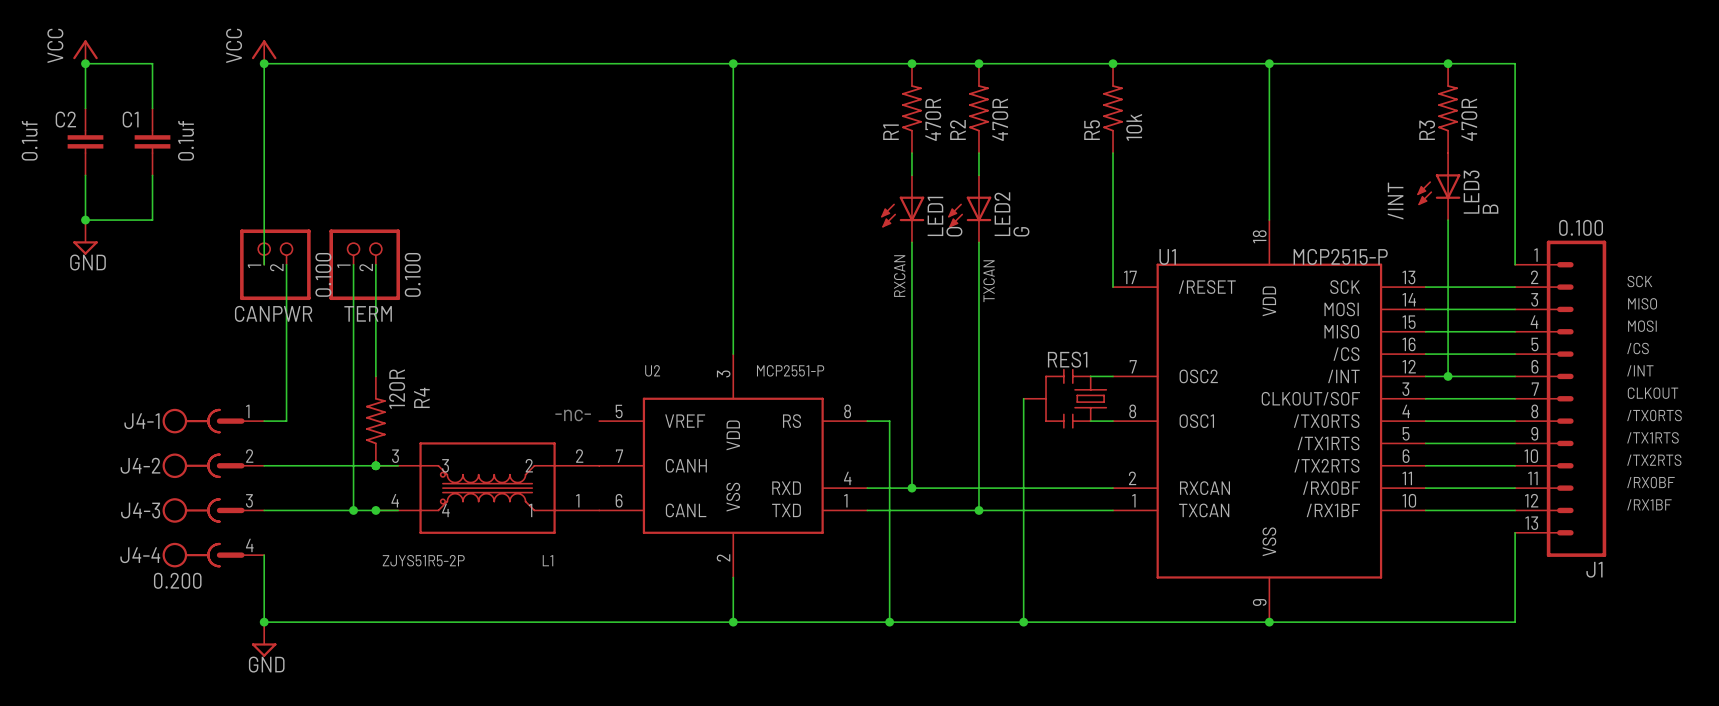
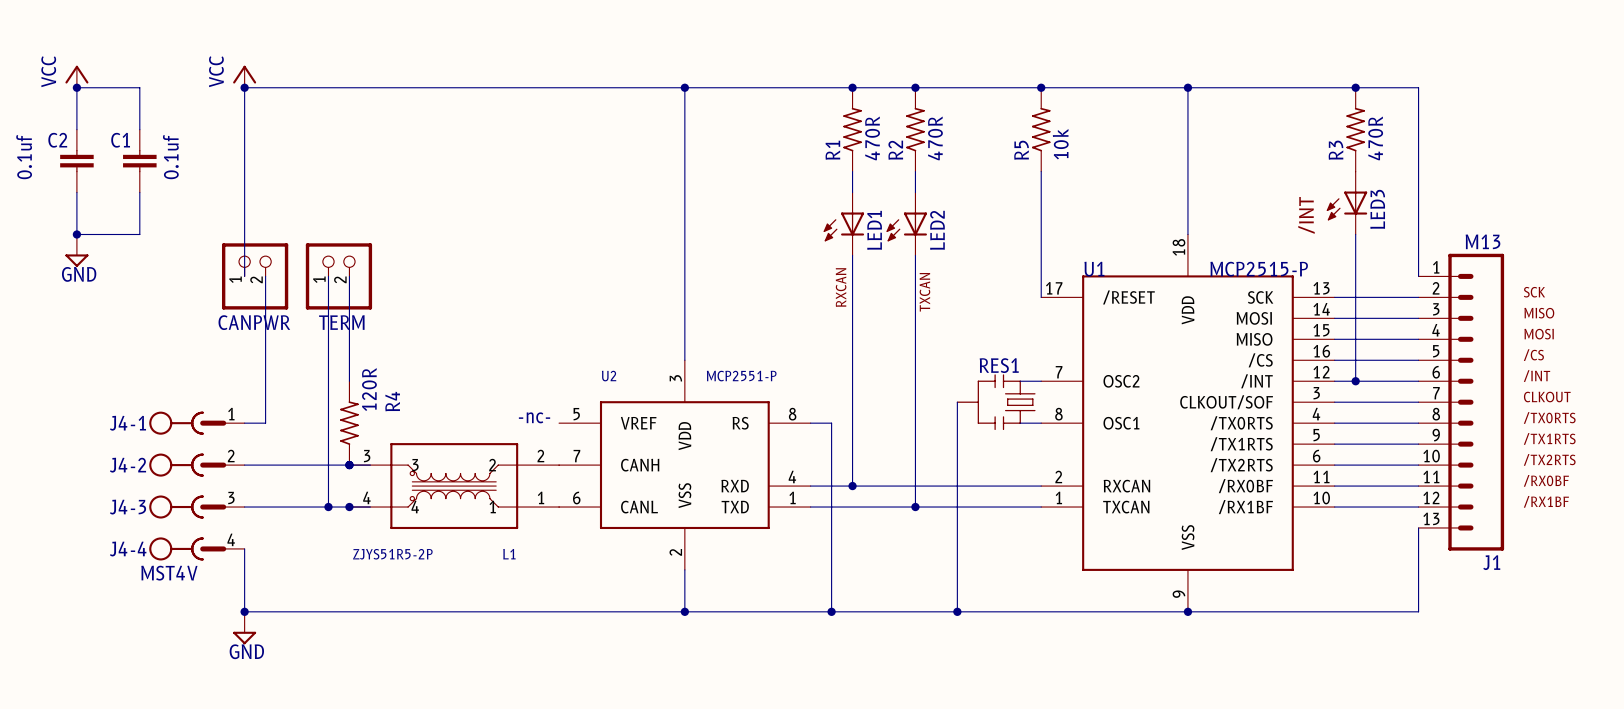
LED3 value: B (1490, 209) -> none
J1 value: 0.100 (1581, 227) -> M13 (1483, 241)
LED1 value: O (954, 231) -> none
LED2 value: G (1021, 231) -> none
CANPWR value: 0.100 (323, 274) -> none
TERM value: 0.100 (412, 274) -> none
J4-4 value: 0.200 (177, 580) -> MST4V (169, 573)

